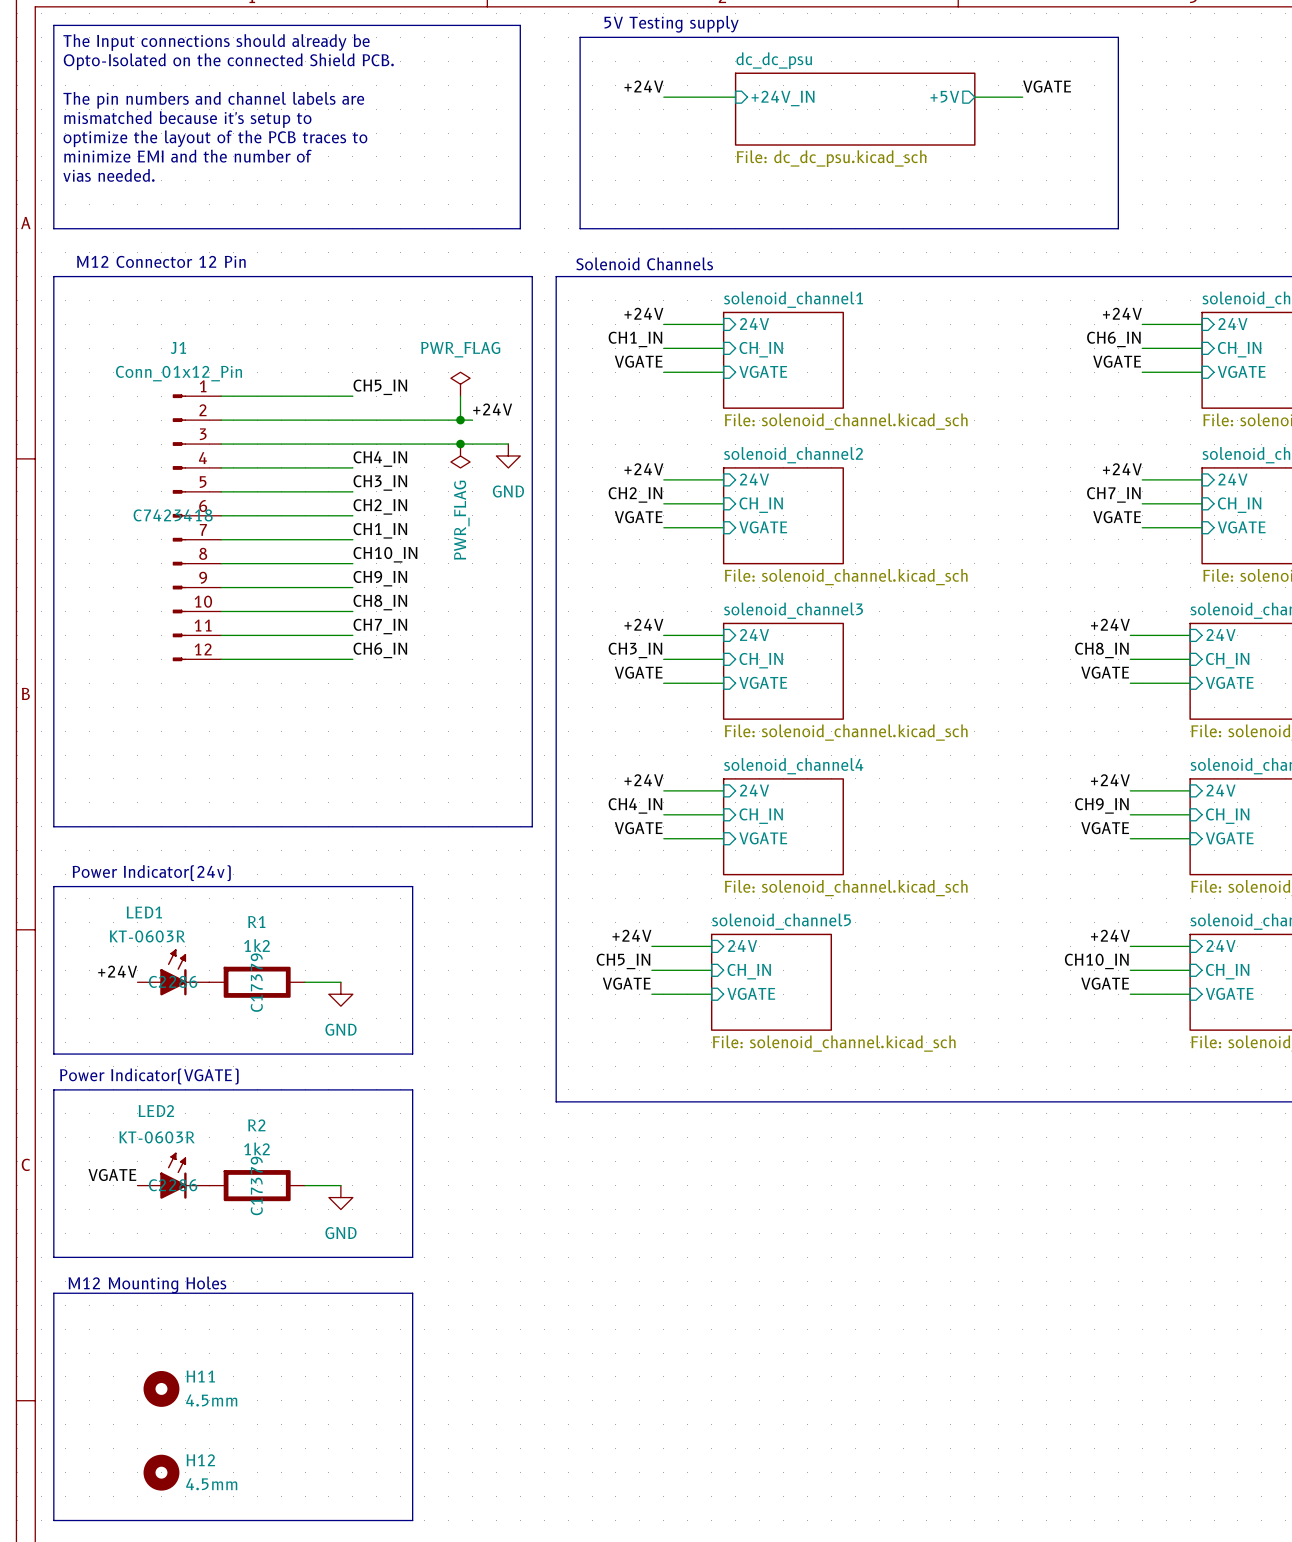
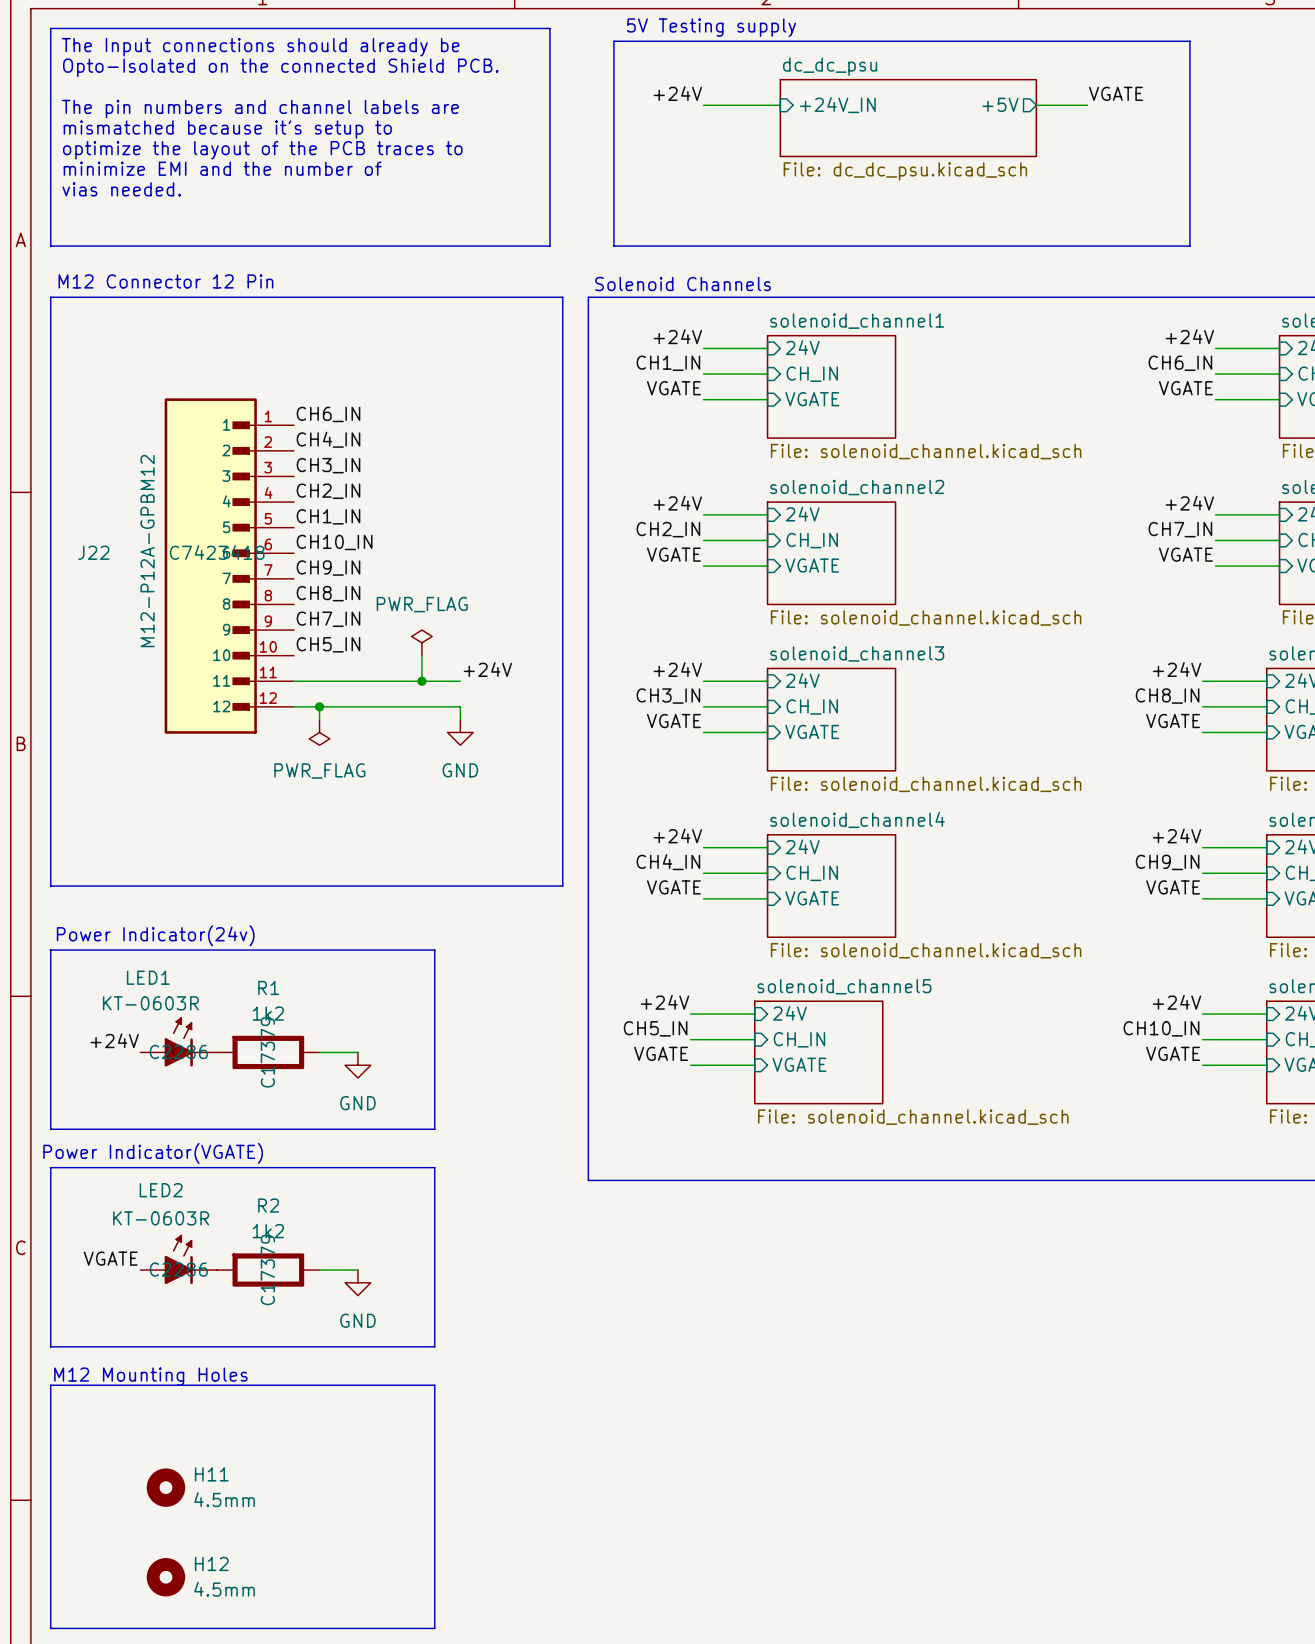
power symbol: PWR_FLAG (460, 384) -> none
label: none -> CH6_IN (328, 414)
label position: CH5_IN (380, 387) -> CH5_IN (328, 644)
wire: (221, 396) (352, 396) -> none
wire: (460, 396) (460, 420) -> (421, 655) (421, 681)
label position: +24V (492, 409) -> +24V (487, 669)
wire: (221, 420) (472, 420) -> none
junction: (460, 420) -> none
wire: (221, 444) (508, 444) -> none
junction: (460, 444) -> none
power symbol: PWR_FLAG (460, 455) -> none
power symbol: GND (508, 455) -> none
label position: CH4_IN (380, 459) -> CH4_IN (328, 439)
wire: (221, 467) (352, 467) -> none
label position: CH3_IN (380, 482) -> CH3_IN (328, 465)
wire: (221, 491) (352, 491) -> none
label position: CH2_IN (380, 506) -> CH2_IN (328, 491)
wire: (221, 515) (352, 515) -> none
J1: Conn_01x12_Pin (197, 527) -> none
J22: none -> M12-P12A-GPBM12 (229, 566)
label position: CH1_IN (380, 530) -> CH1_IN (328, 516)
wire: (221, 539) (352, 539) -> none
label position: CH10_IN (385, 554) -> CH10_IN (334, 542)
wire: (221, 563) (352, 563) -> none
label position: CH9_IN (380, 578) -> CH9_IN (328, 568)
wire: (221, 587) (352, 587) -> none
power symbol: none -> PWR_FLAG (421, 642)
label position: CH8_IN (380, 602) -> CH8_IN (328, 593)
wire: (221, 611) (352, 611) -> none
label position: CH7_IN (380, 626) -> CH7_IN (328, 619)
wire: none -> (370, 681) (460, 681)
junction: none -> (421, 681)
label: CH6_IN (380, 650) -> none
wire: none -> (319, 706) (319, 719)
junction: none -> (319, 706)
wire: none -> (370, 706) (460, 706) (460, 719)
power symbol: none -> PWR_FLAG (319, 732)
power symbol: none -> GND (460, 732)

